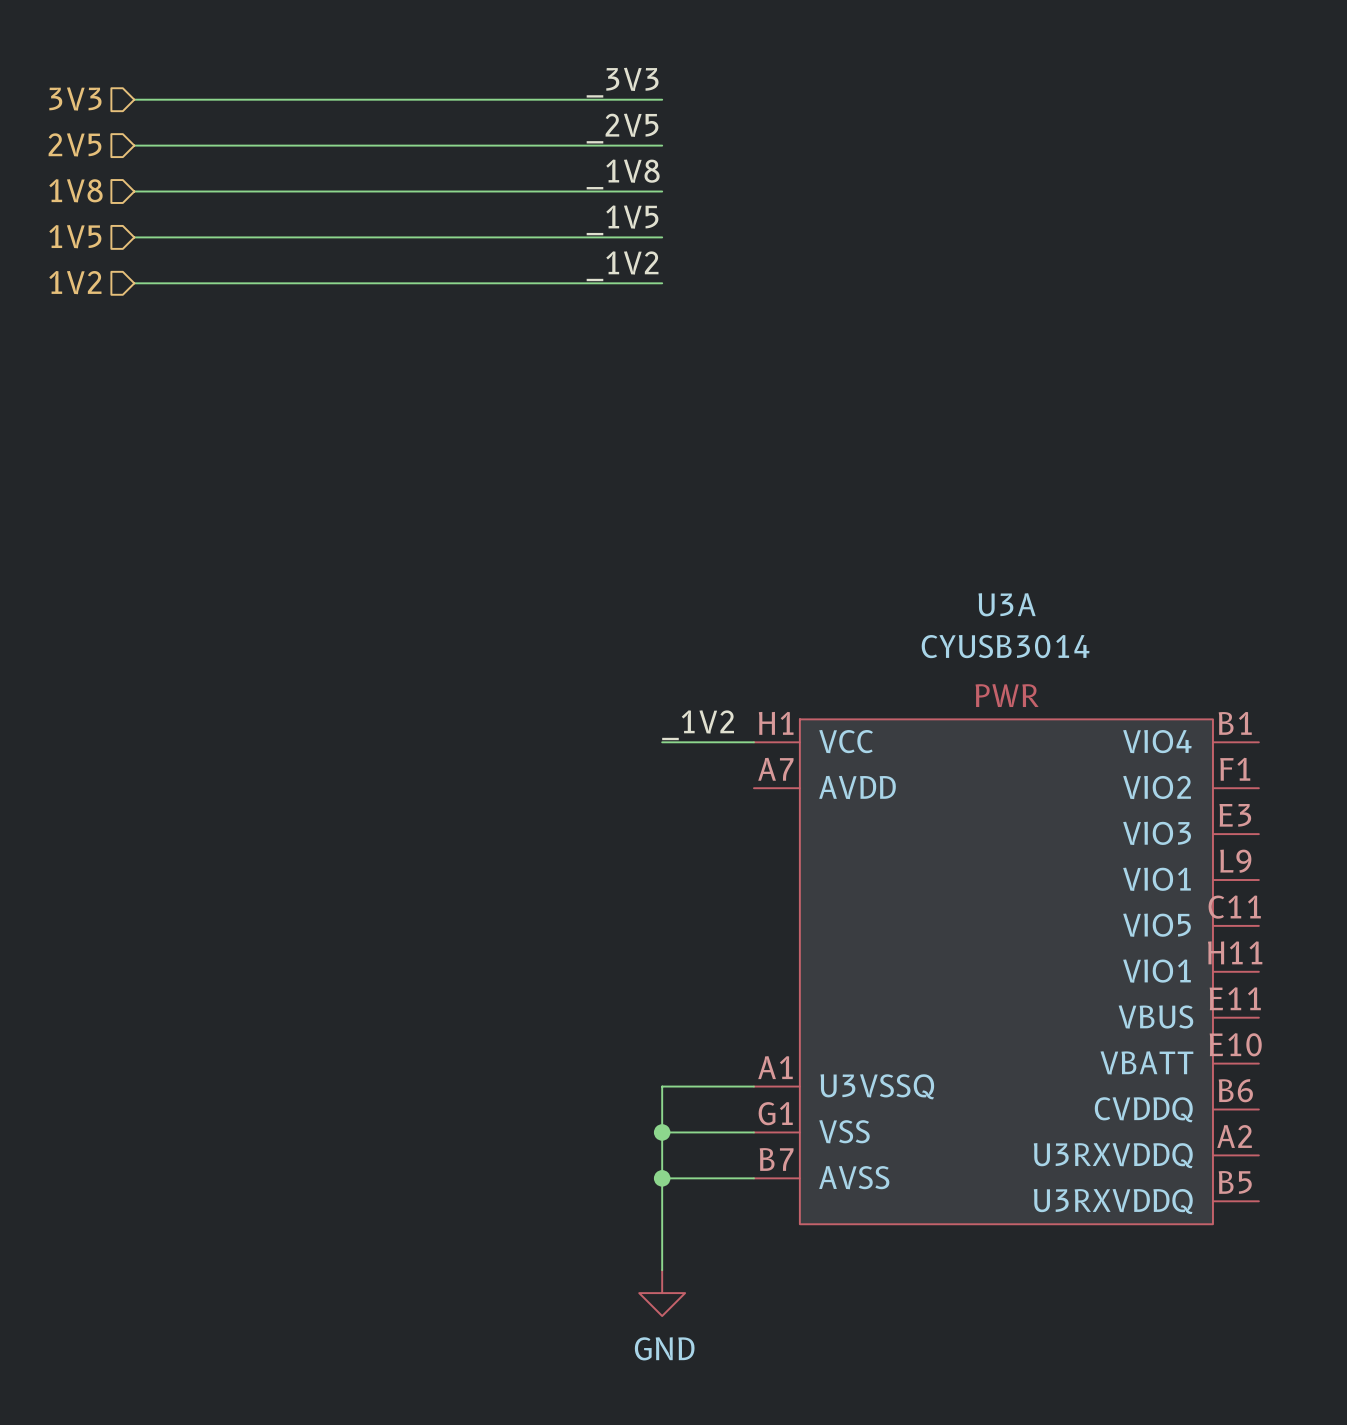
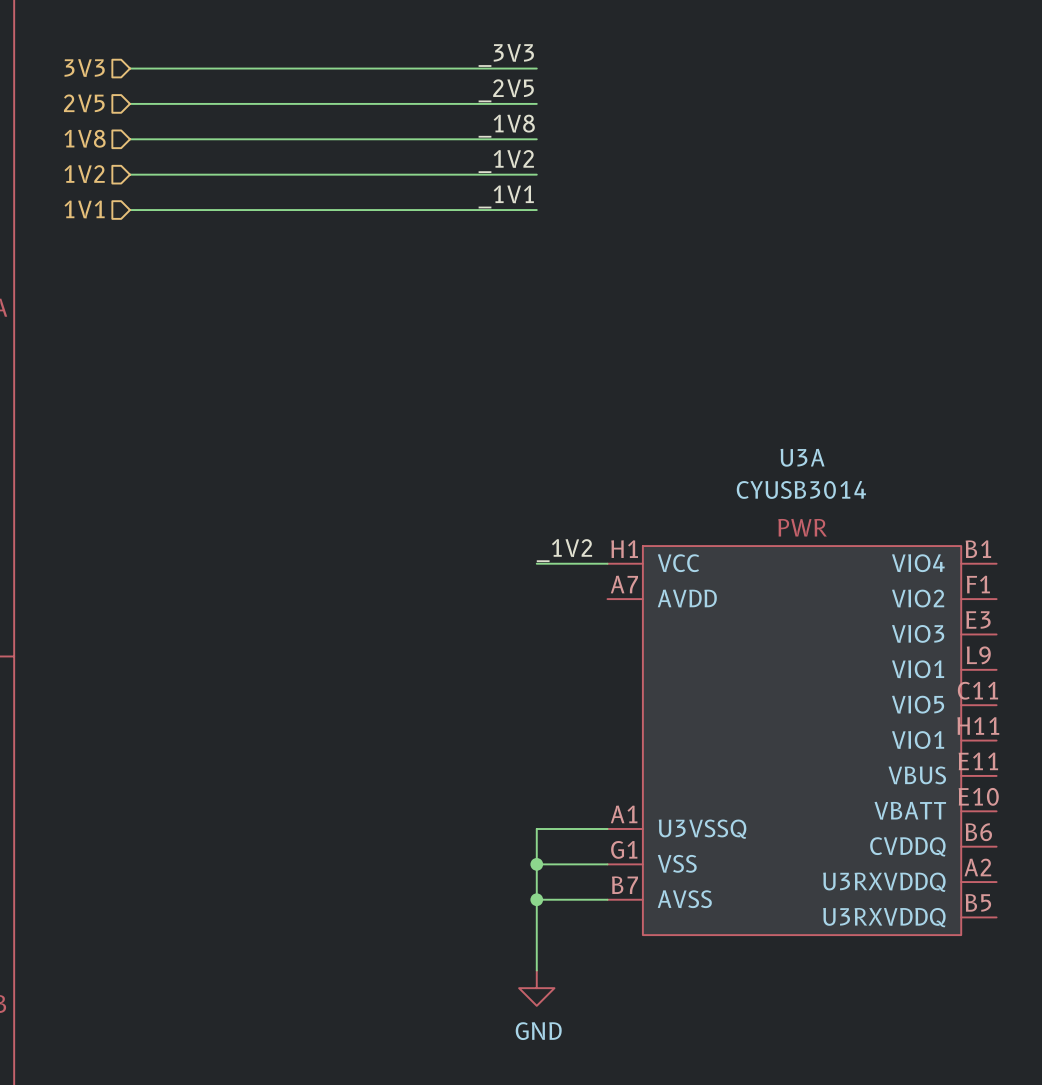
label: _1V5 (622, 220) -> _1V2 (506, 161)
hierarchical label: 1V5 (75, 236) -> 1V2 (84, 174)
label: _1V2 (622, 266) -> _1V1 (506, 196)
hierarchical label: 1V2 (75, 282) -> 1V1 (84, 209)

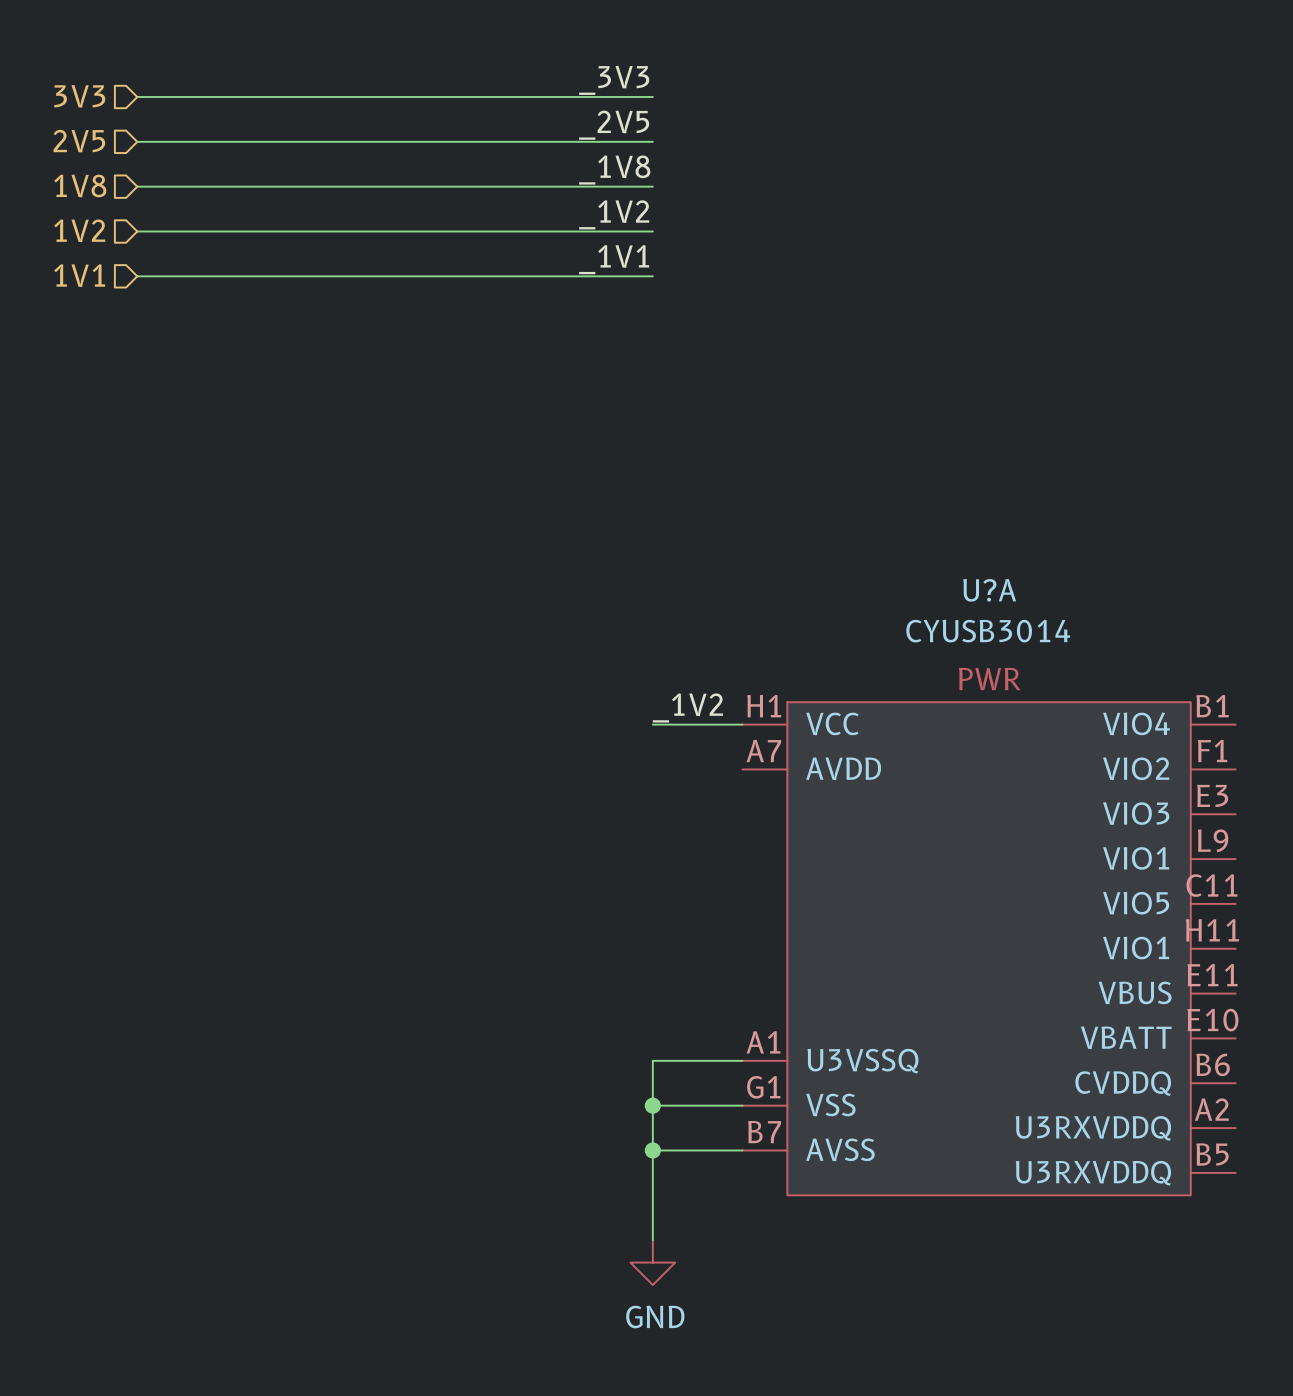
U3A name: U3A (802, 457) -> U?A (989, 590)

